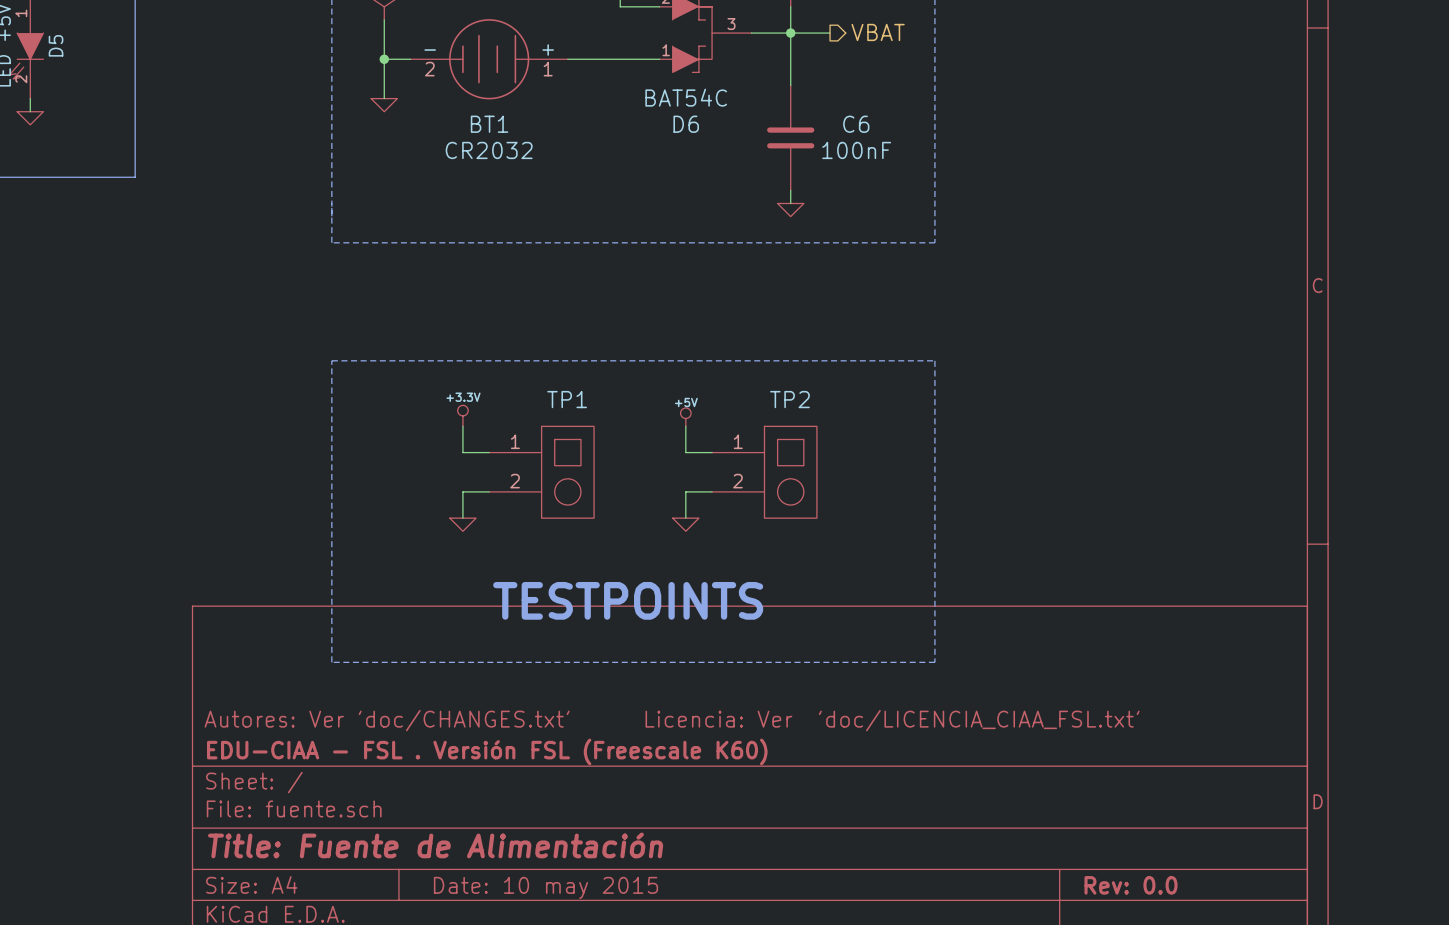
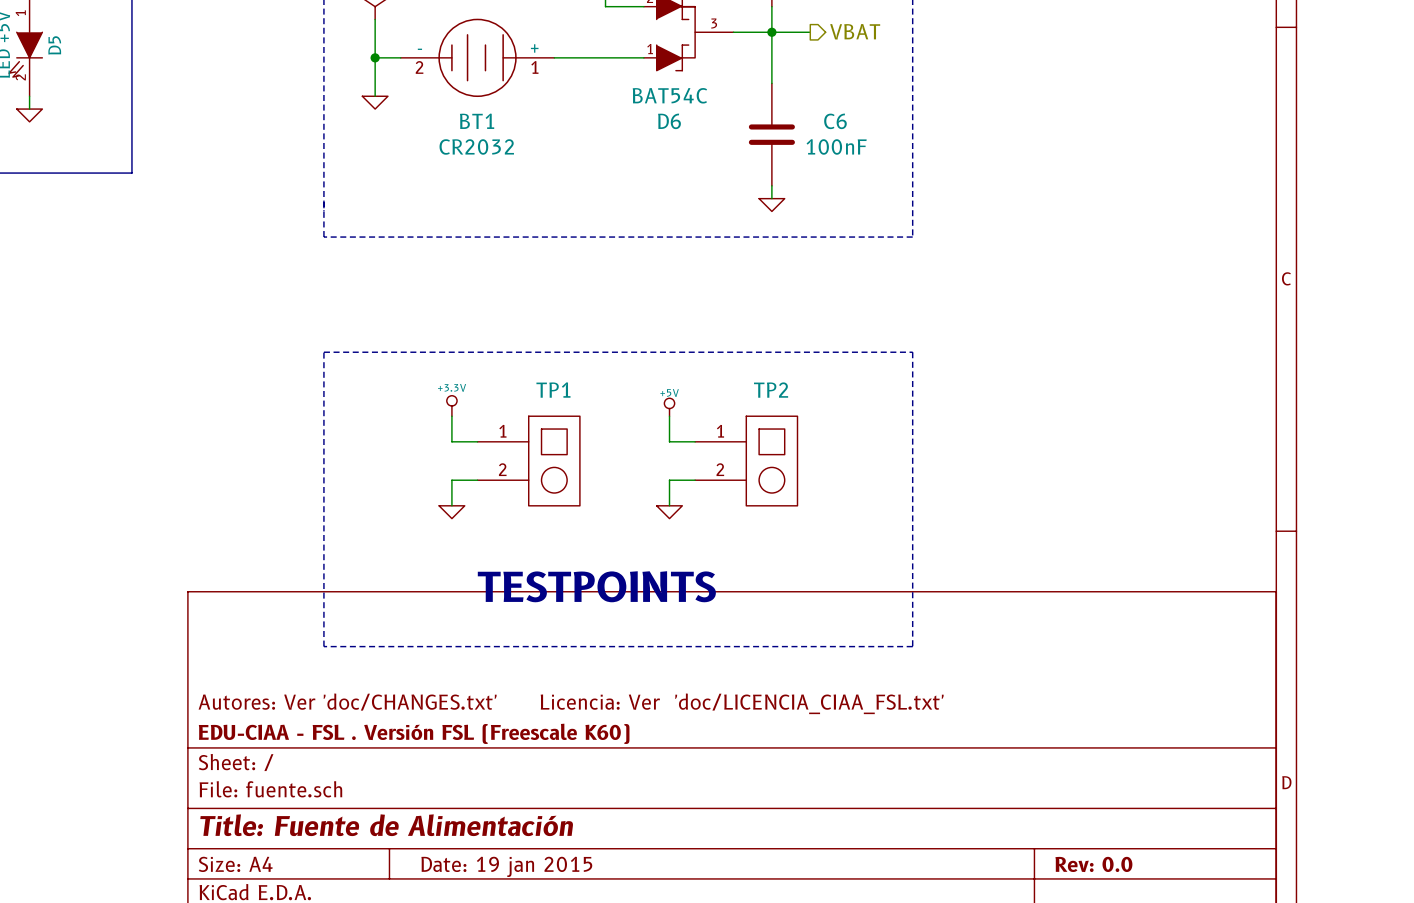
title block: Date: 10 may 2015 (546, 887) -> Date: 19 jan 2015 (506, 866)

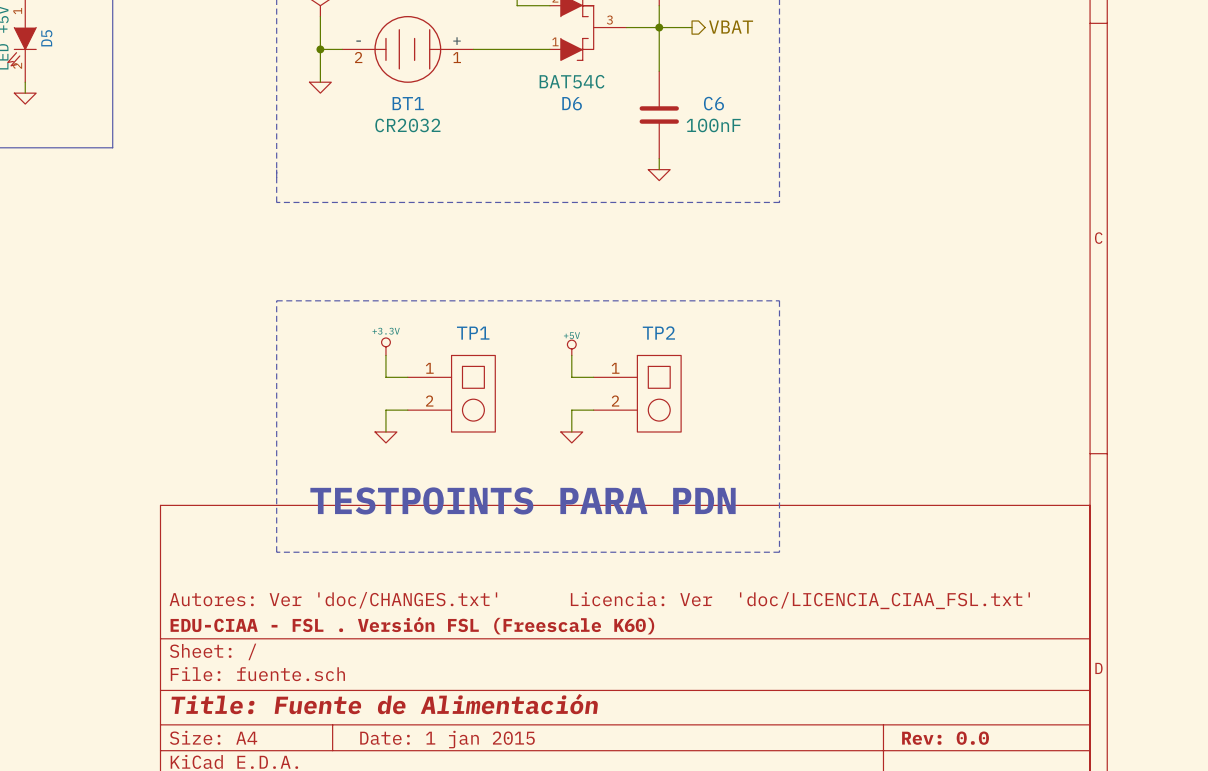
text: TESTPOINTS (596, 586) -> TESTPOINTS PARA PDN (523, 500)
title block: Date: 19 jan 2015 (506, 866) -> Date: 1 jan 2015 (447, 739)

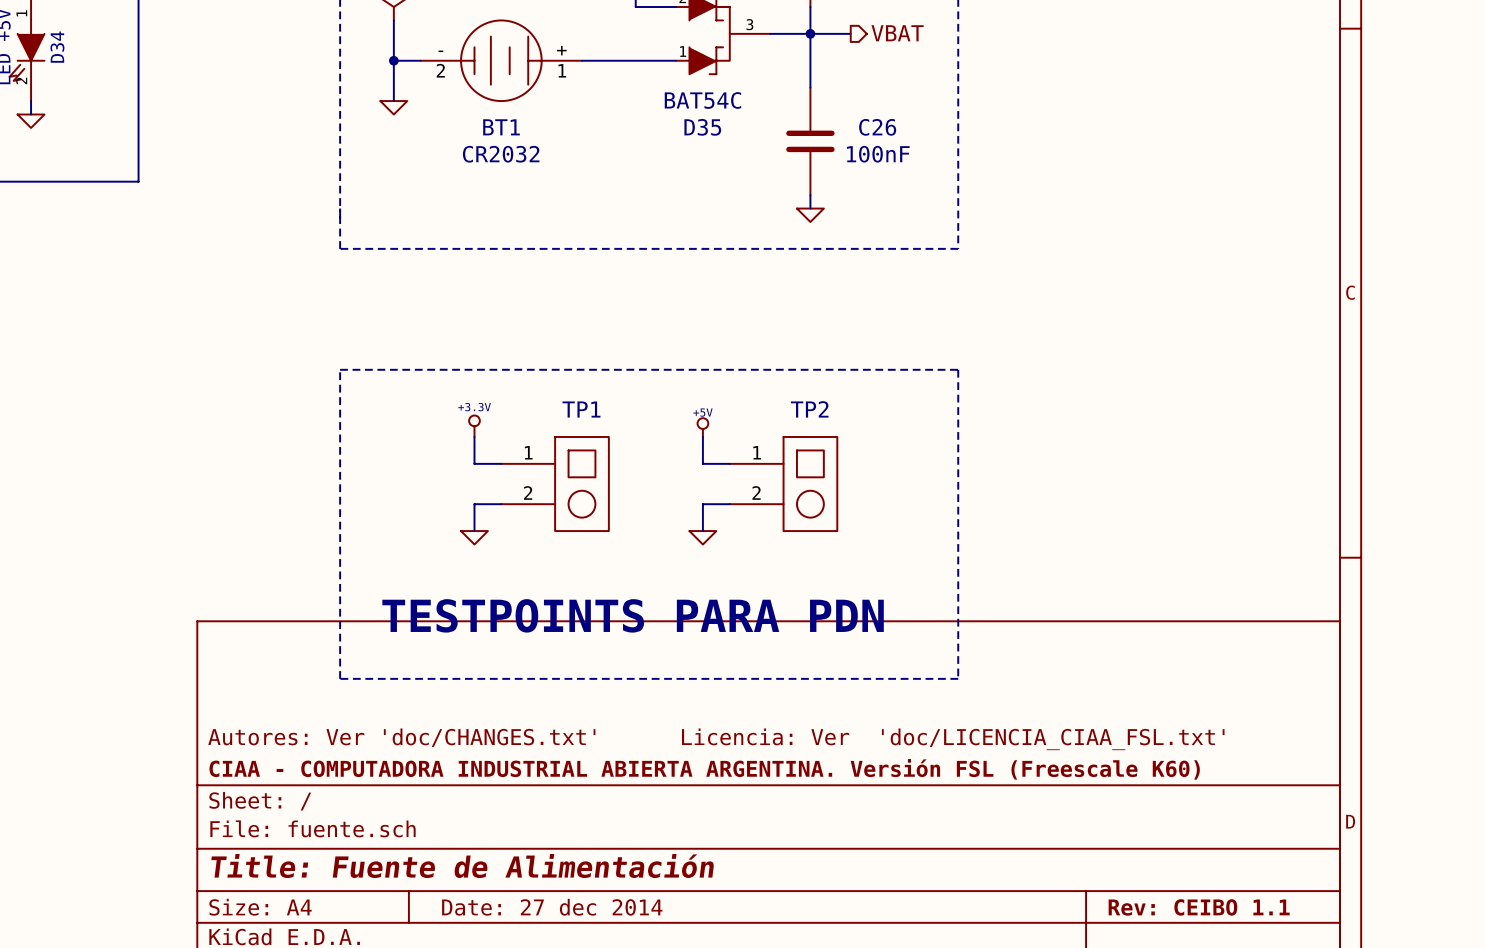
D5 name: D5 (46, 38) -> D34 (57, 47)
D6 name: D6 (572, 103) -> D35 (702, 127)
C6 name: C6 (713, 103) -> C26 (877, 127)
title block: EDU-CIAA - FSL . Versión FSL (Freescale K60) (412, 625) -> CIAA - COMPUTADORA INDUSTRIAL ABIERTA ARGENTINA. Versión FSL (Freescale K60) (704, 769)
title block: Rev: 0.0 (945, 738) -> Rev: CEIBO 1.1 (1199, 907)
title block: Date: 1 jan 2015 (447, 739) -> Date: 27 dec 2014 (552, 907)

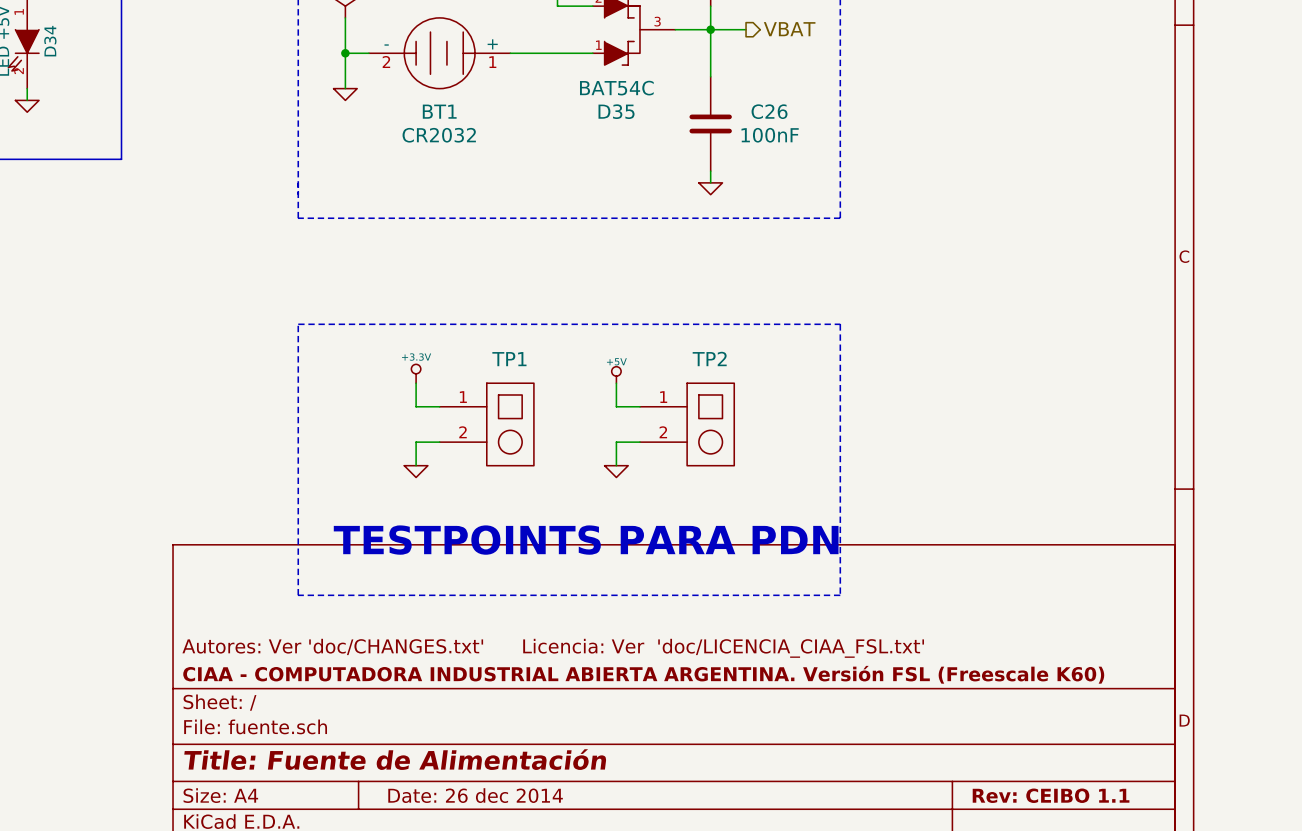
title block: Date: 27 dec 2014 (552, 907) -> Date: 26 dec 2014 (475, 795)

